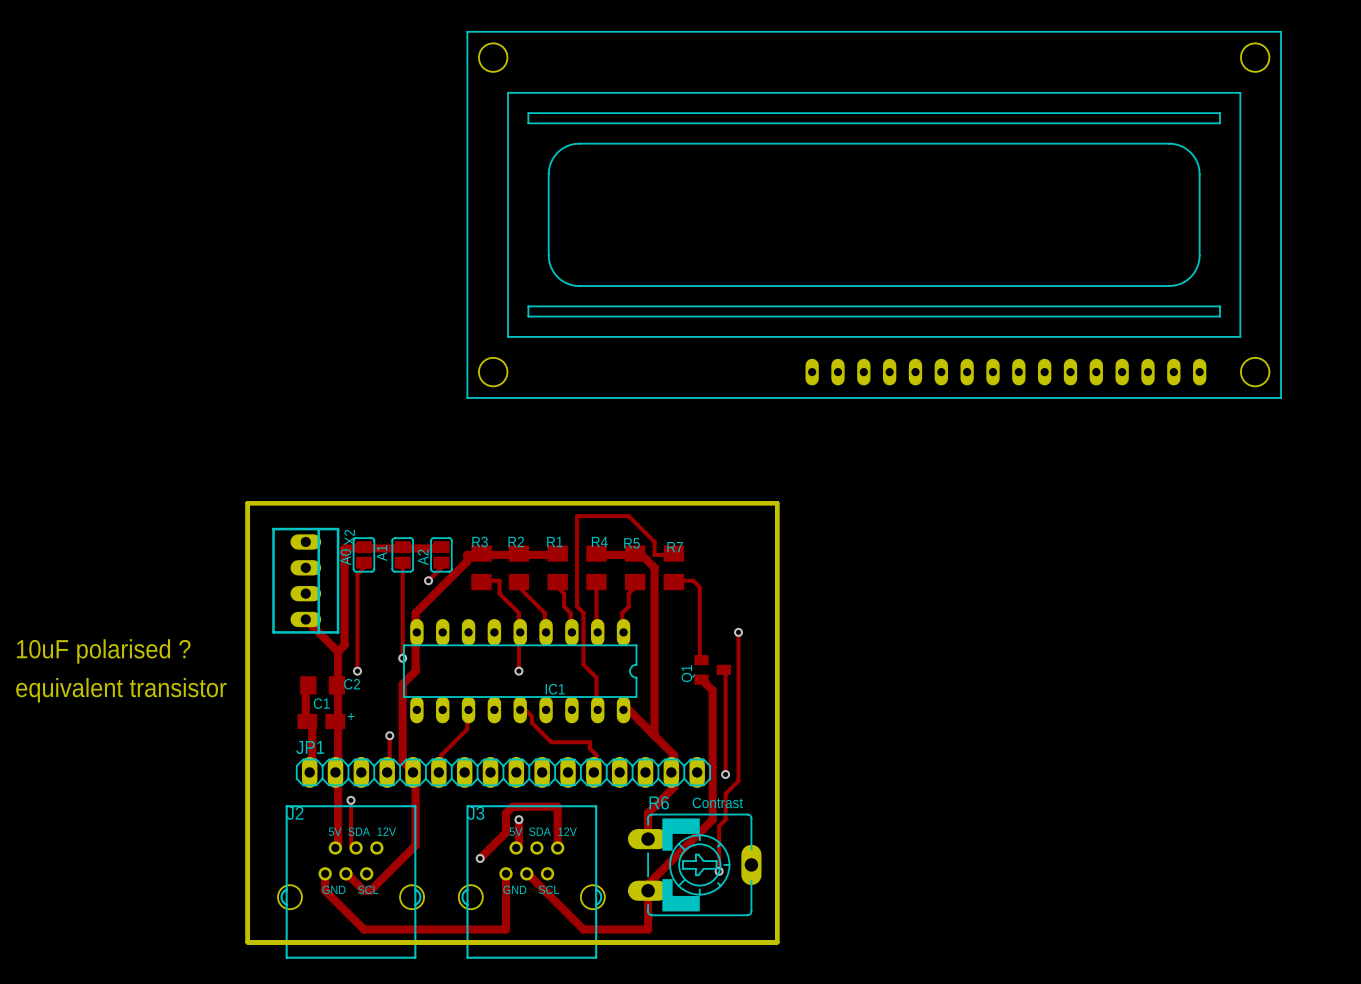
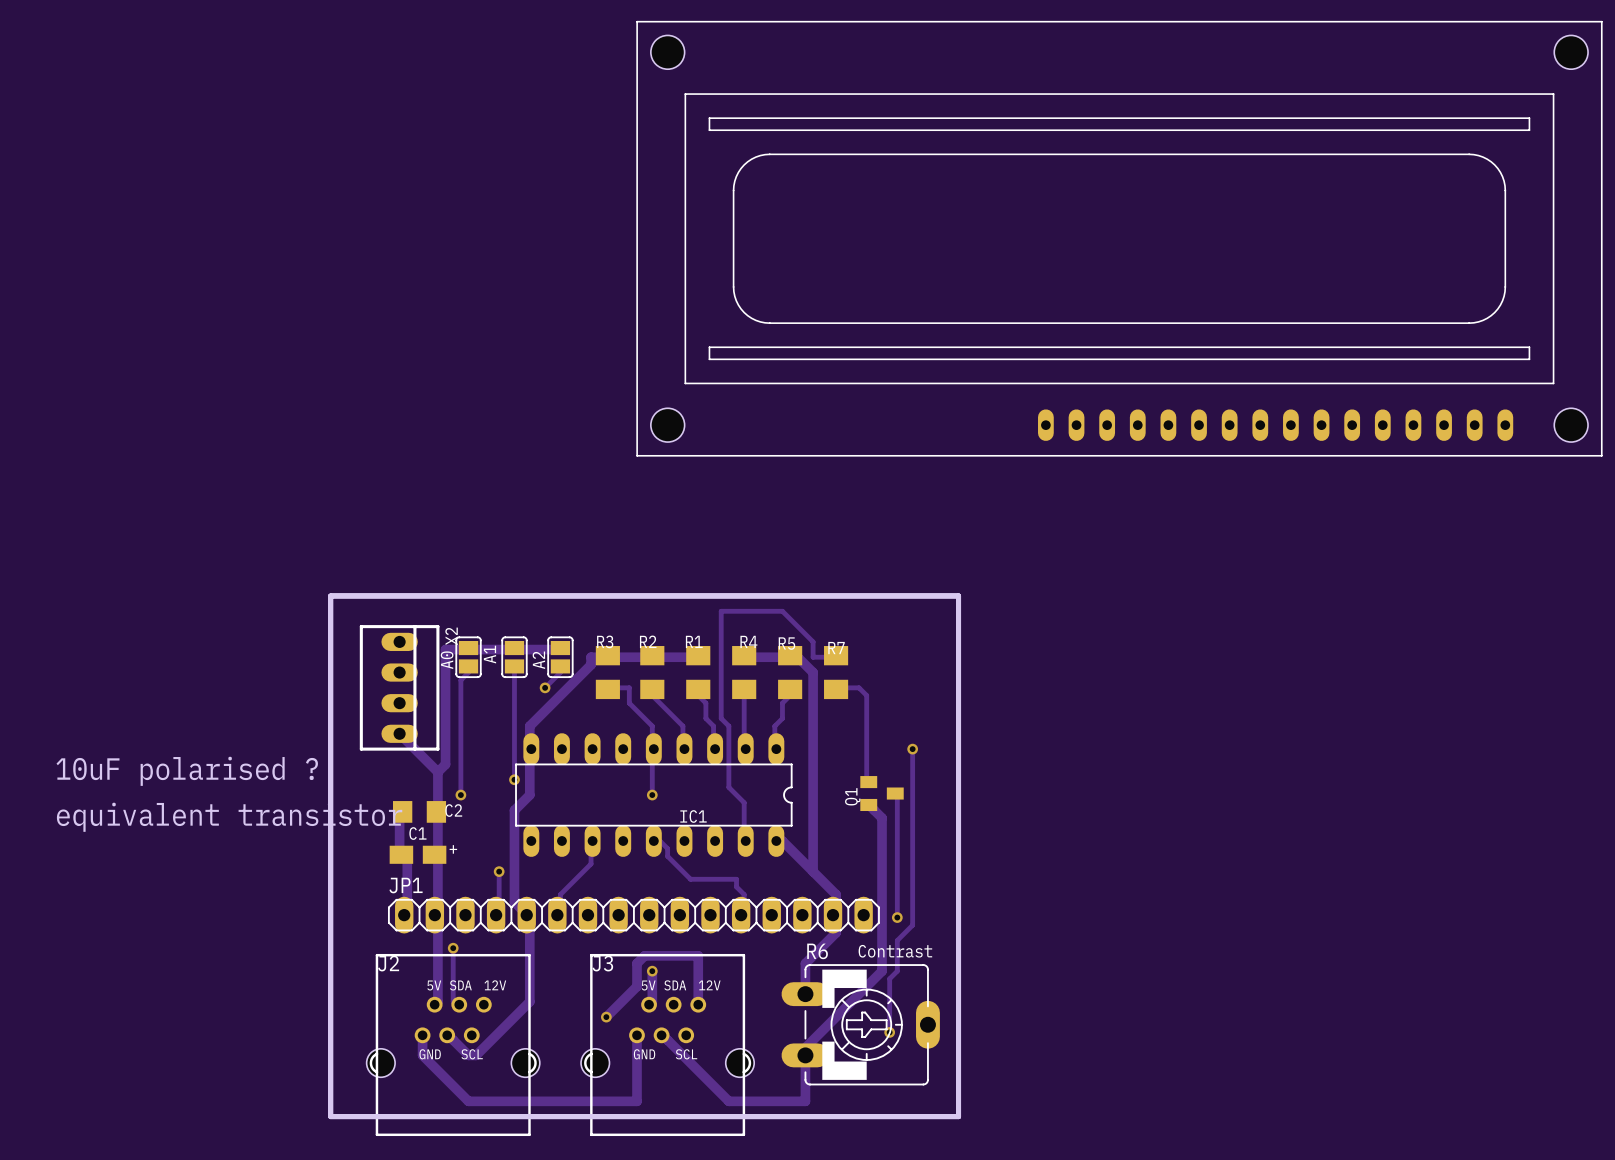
part position: (874, 214) -> (1119, 238)

